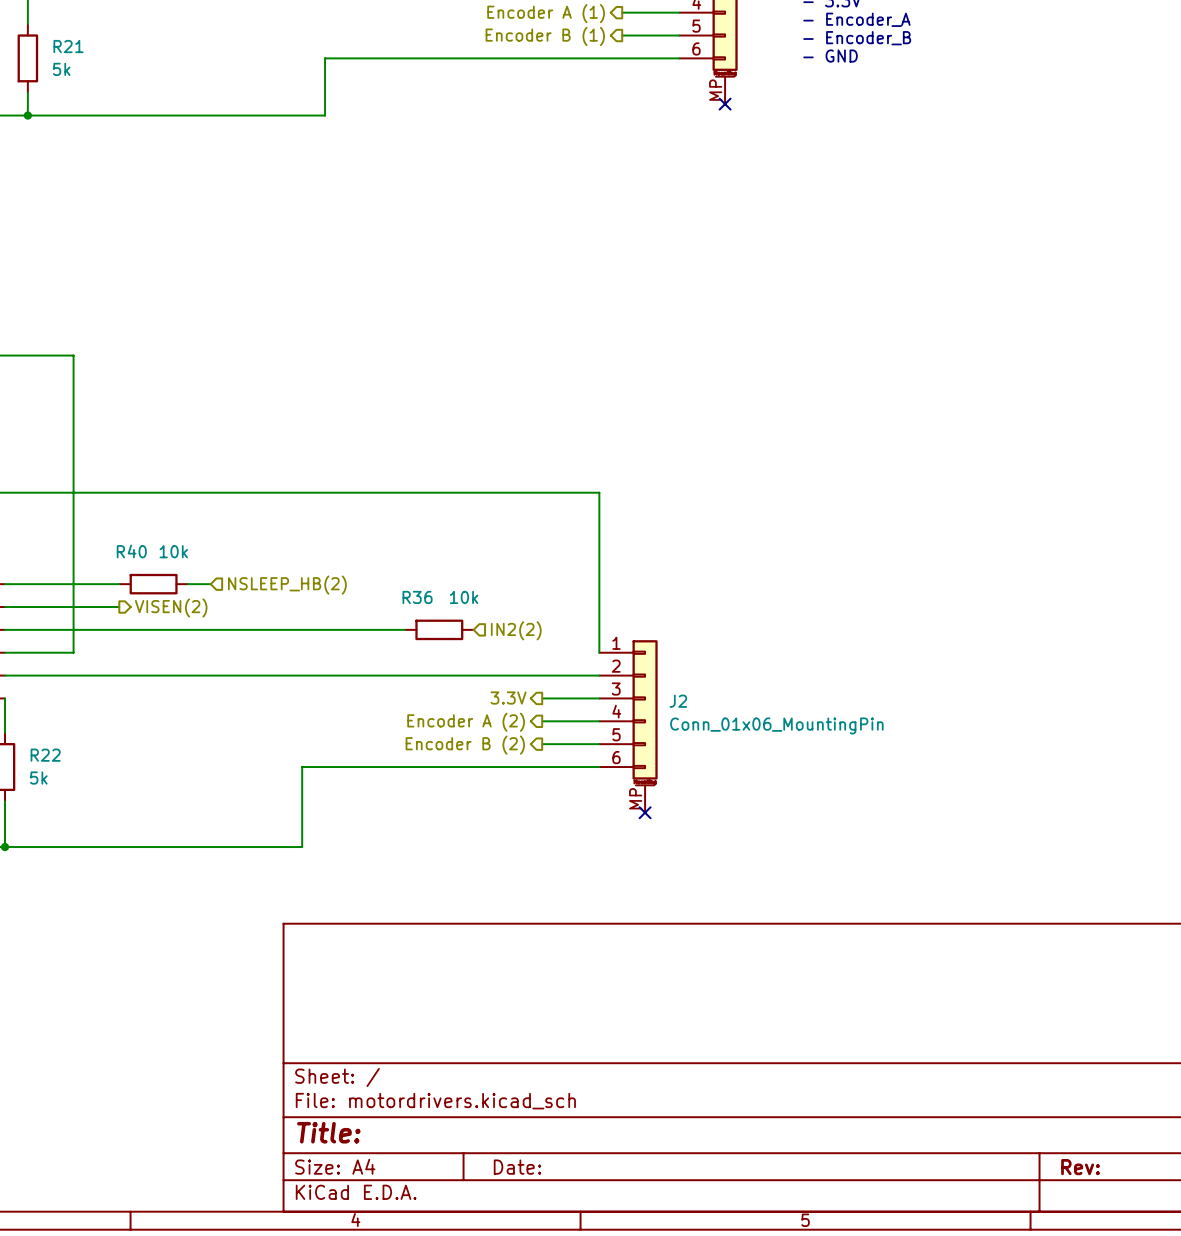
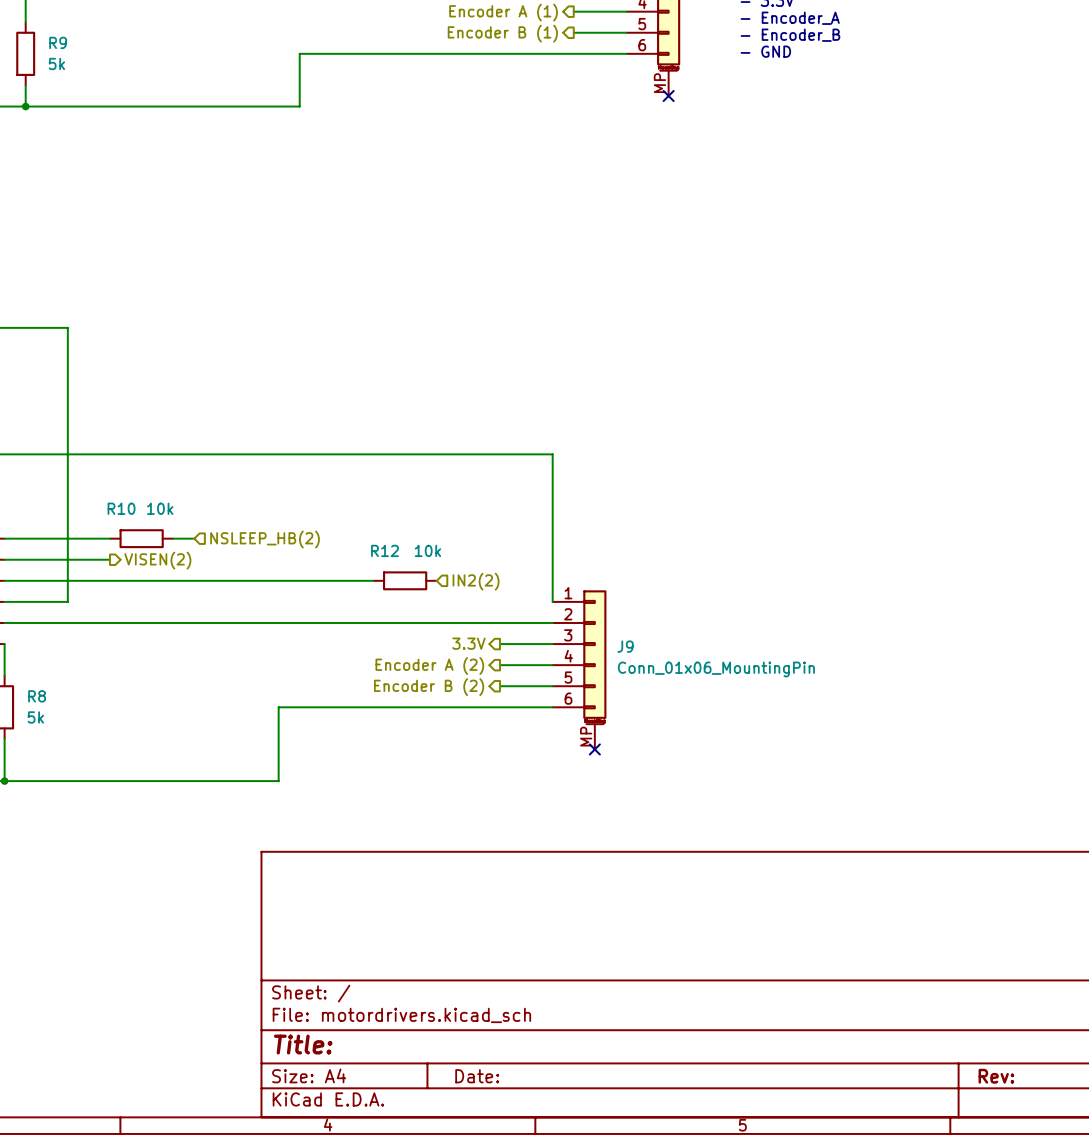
R21 name: R21 (68, 46) -> R9 (58, 42)
R40 name: R40 (131, 551) -> R10 (121, 508)
R36 name: R36 (417, 597) -> R12 (385, 550)
J2 name: J2 (678, 701) -> J9 (625, 646)
R22 name: R22 (45, 755) -> R8 (37, 696)

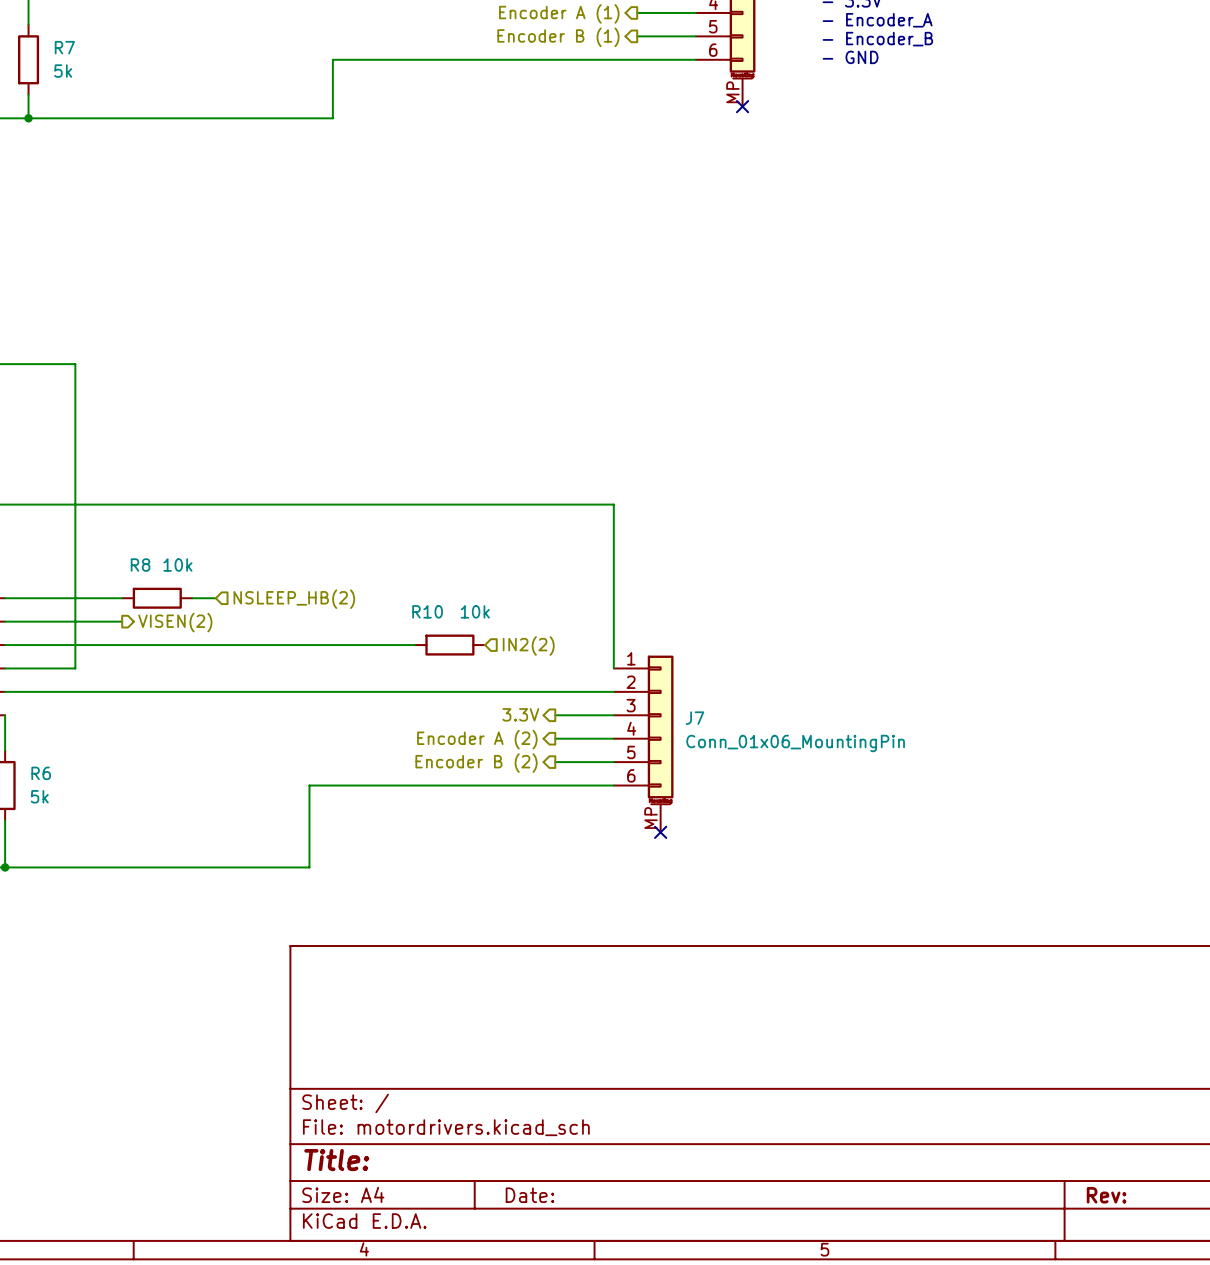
R9 name: R9 (58, 42) -> R7 (64, 47)
R10 name: R10 (121, 508) -> R8 (140, 565)
R12 name: R12 (385, 550) -> R10 (427, 611)
J9 name: J9 (625, 646) -> J7 (694, 718)
R8 name: R8 (37, 696) -> R6 (41, 773)

